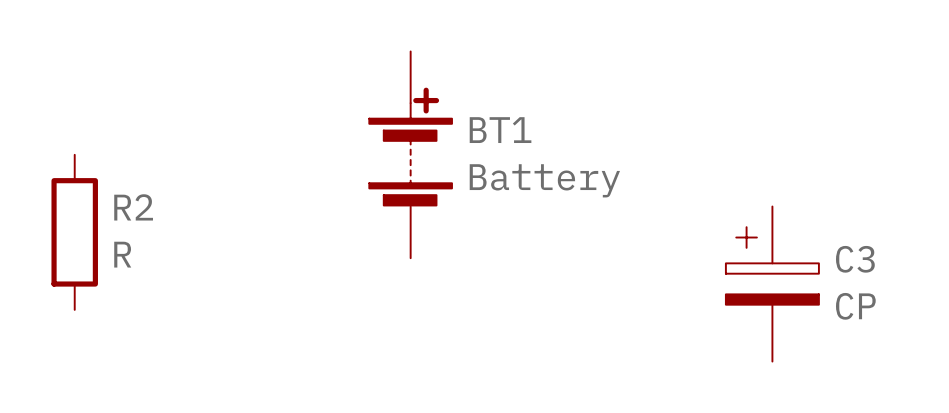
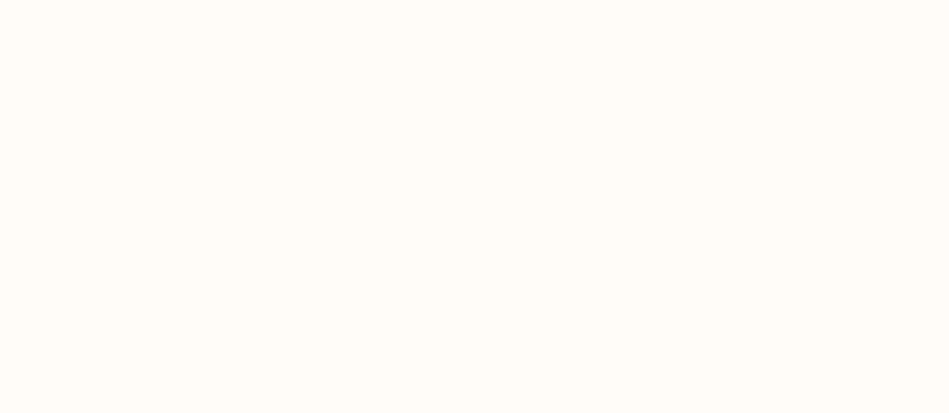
BT1: Battery (410, 154) -> none
R2: R (74, 232) -> none
C3: CP (772, 284) -> none

